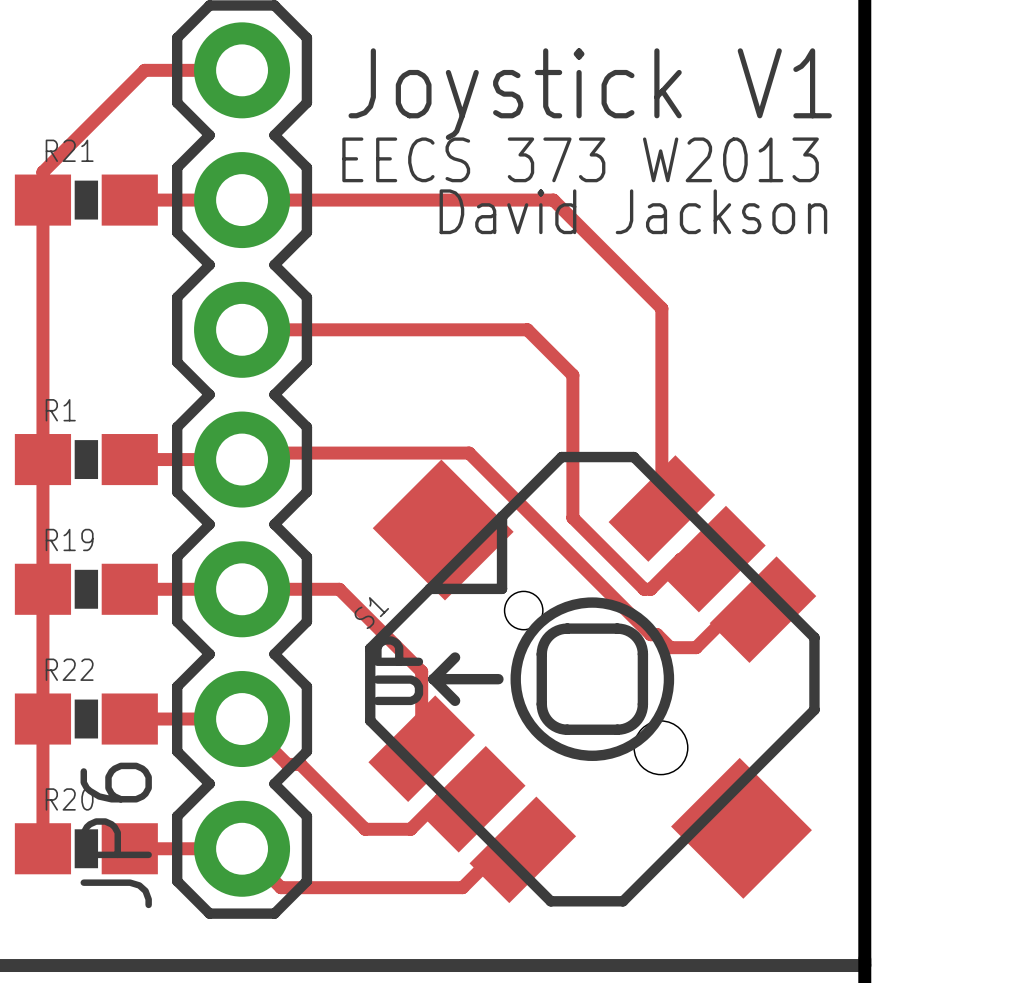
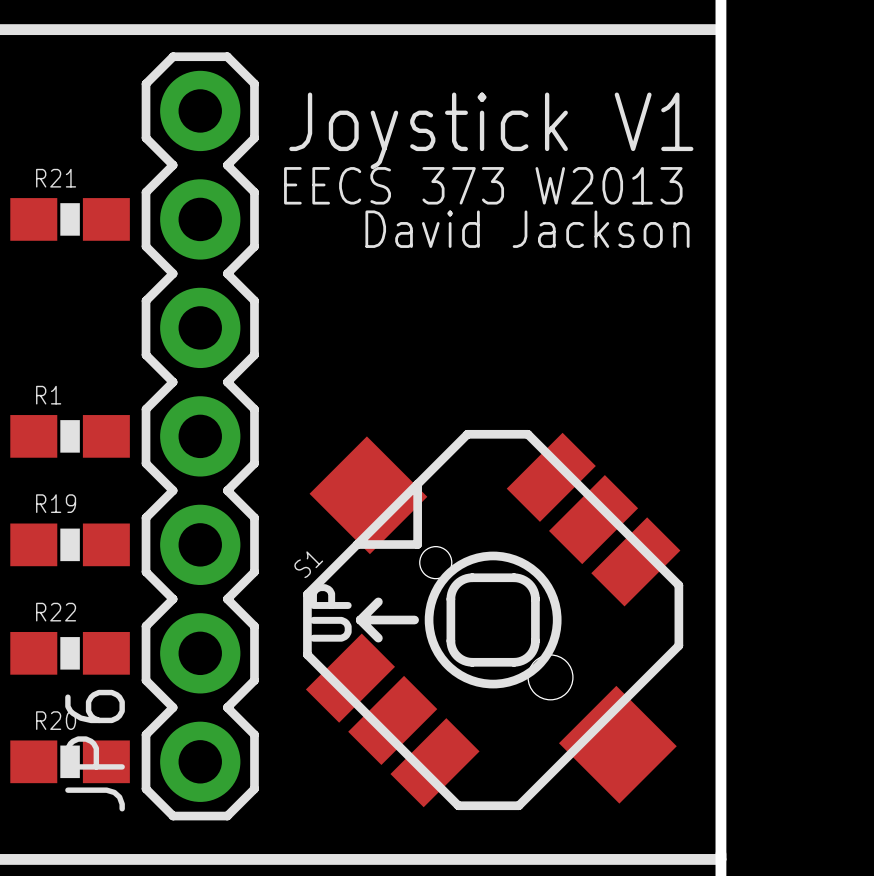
track: (242, 70) (144, 70) (42, 172) (42, 848) -> none
track: (129, 200) (553, 200) (661, 308) (661, 508) -> none
track: (242, 329) (527, 329) (572, 375) (572, 517) (644, 589) (650, 589) (680, 559) (712, 559) -> none
track: (129, 459) (242, 459) (248, 453) (469, 453) (650, 634) (657, 634) (670, 647) (696, 647) (734, 609) (762, 609) -> none
track: (129, 589) (339, 589) (421, 671) (421, 748) -> none
track: (129, 719) (242, 719) (287, 764) (300, 764) (365, 829) (410, 829) (440, 799) (472, 799) -> none
track: (129, 848) (242, 848) (280, 887) (462, 887) (500, 849) (522, 849) -> none

